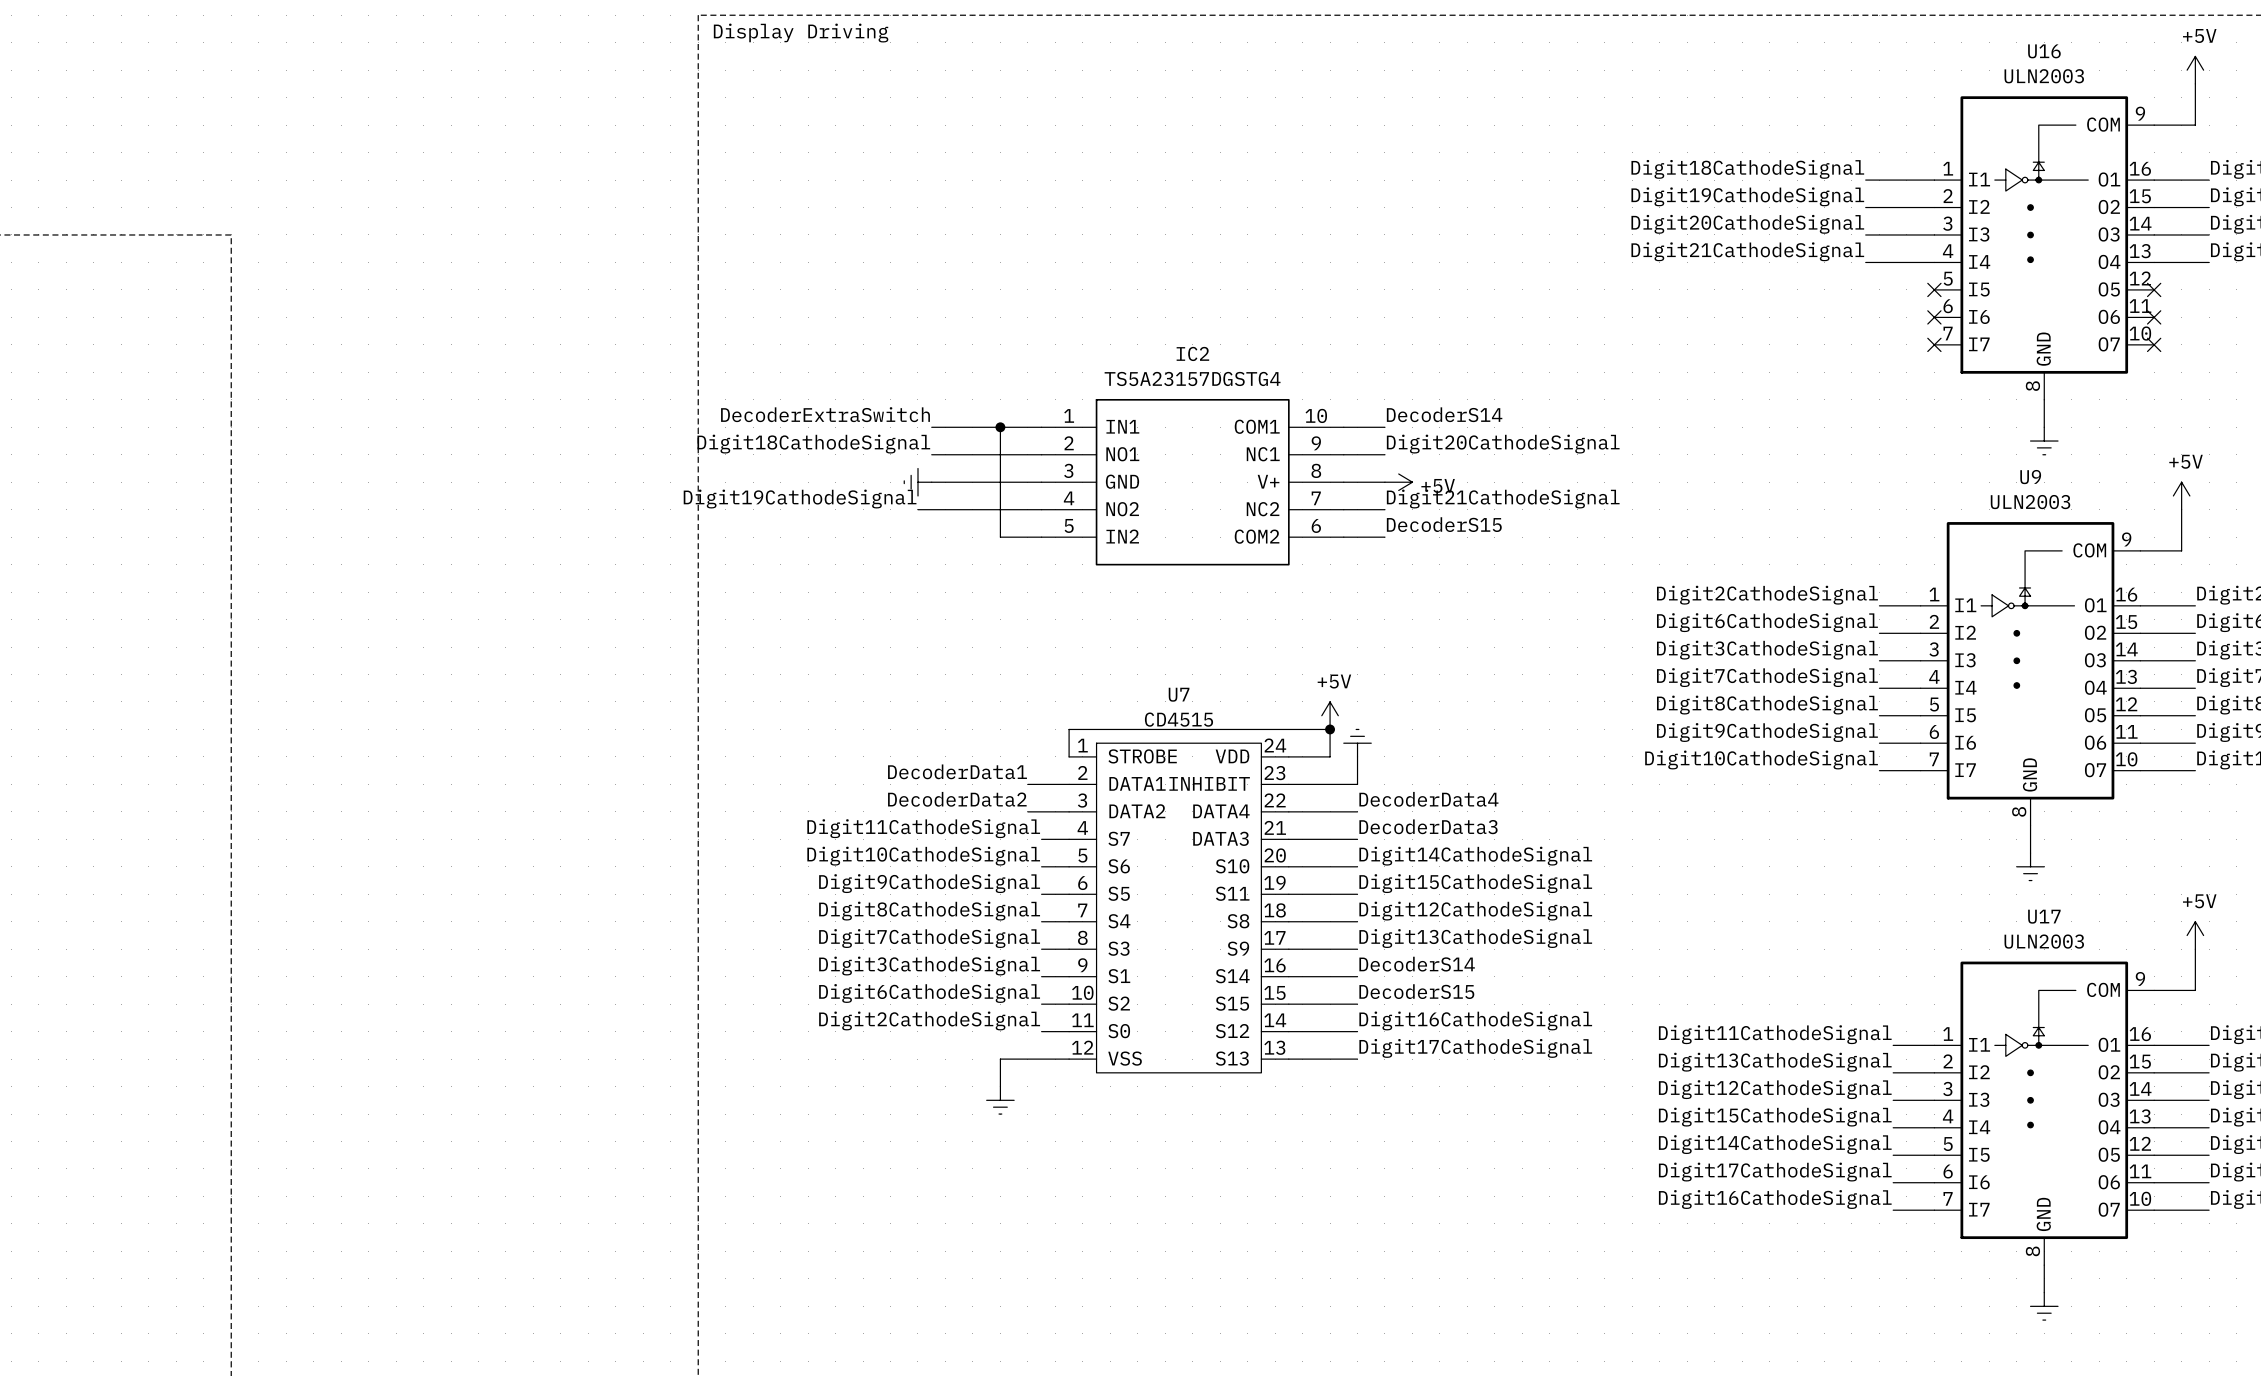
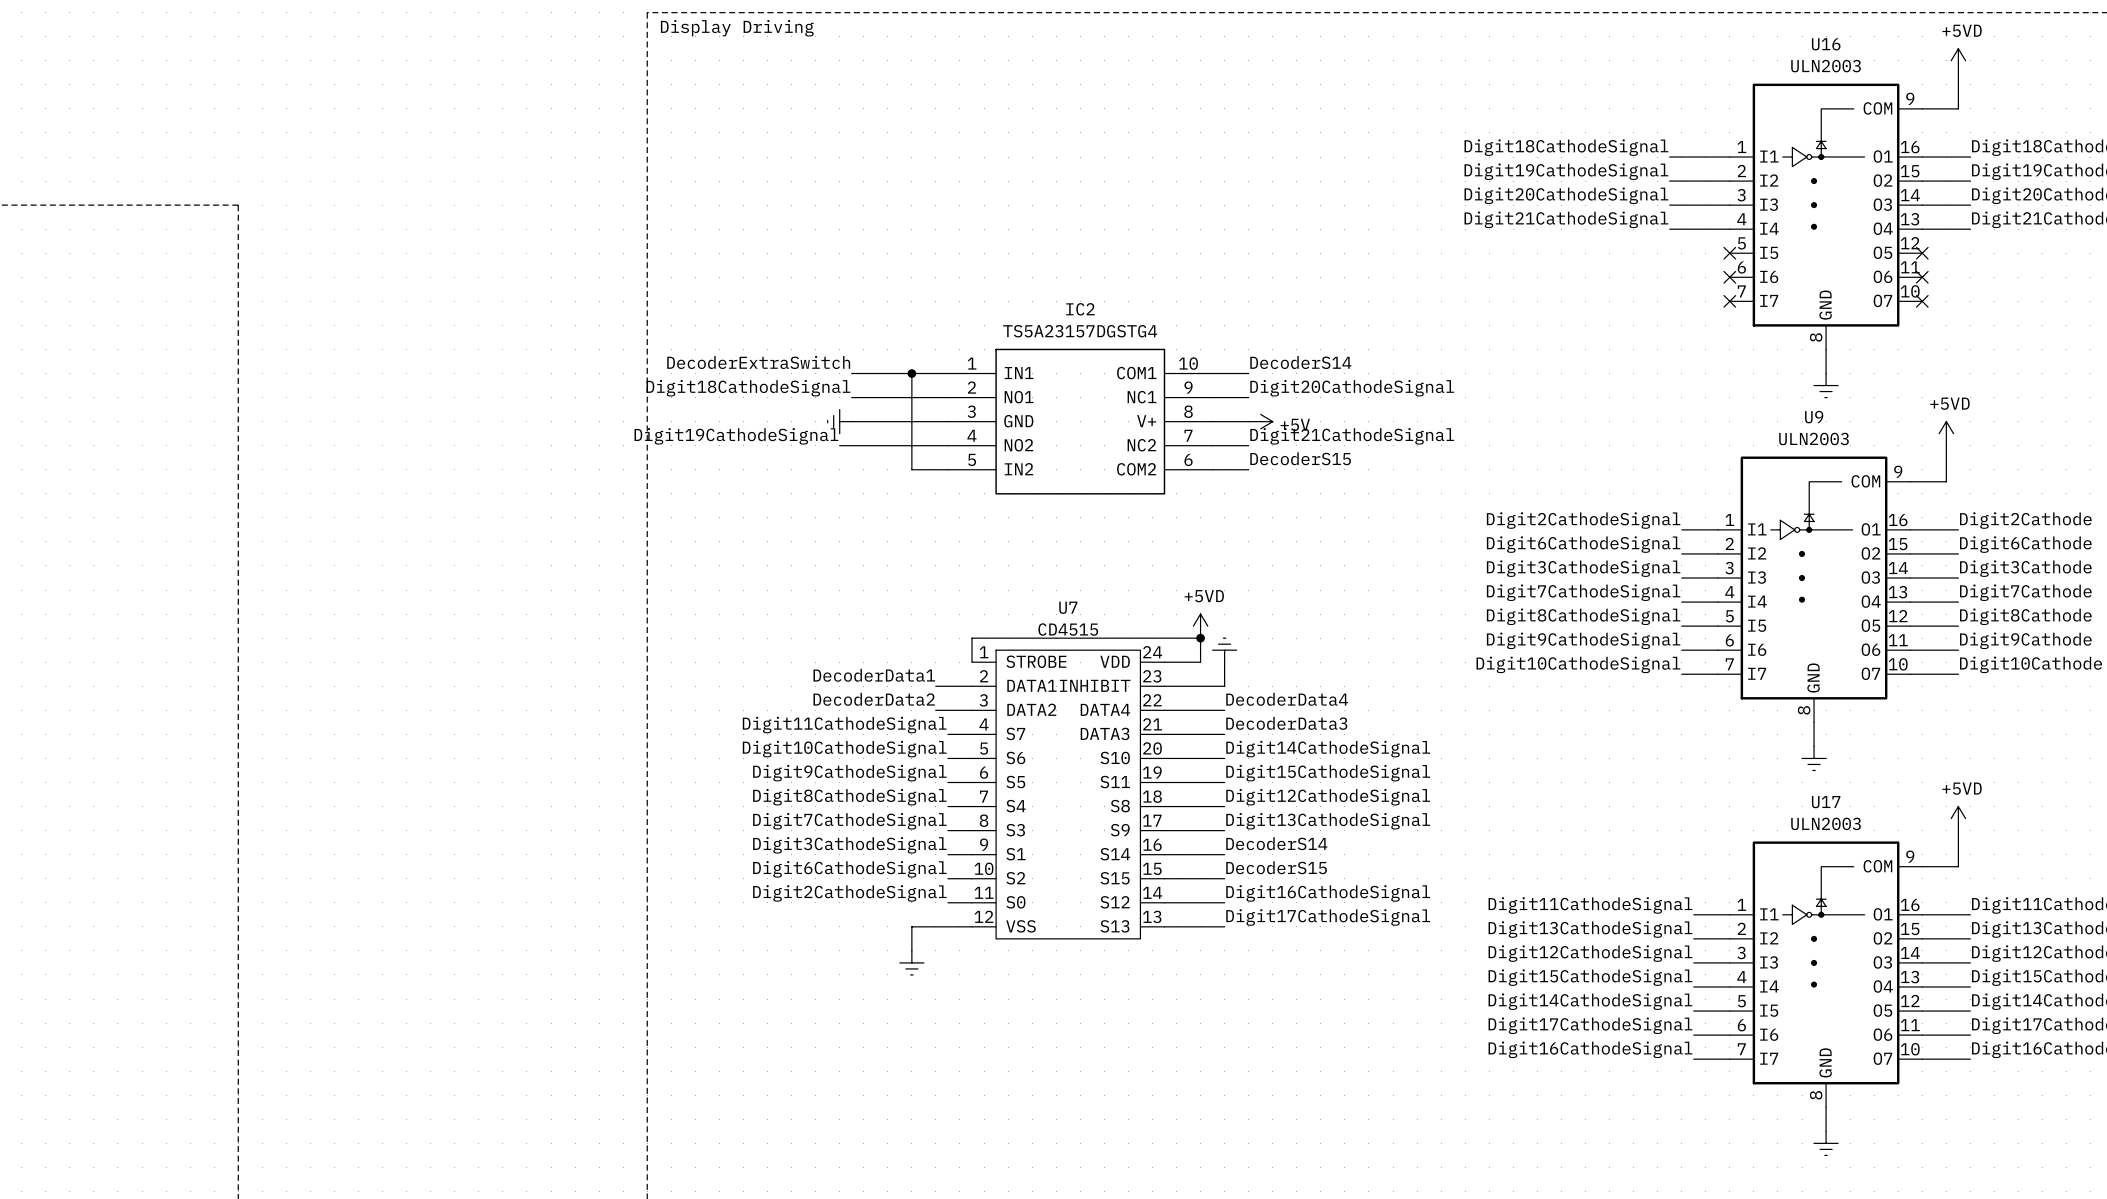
power symbol: +5V (2195, 70) -> +5VD (1958, 60)
power symbol: +5V (2181, 495) -> +5VD (1946, 433)
power symbol: +5V (1330, 715) -> +5VD (1200, 626)
power symbol: +5V (2195, 935) -> +5VD (1958, 818)

